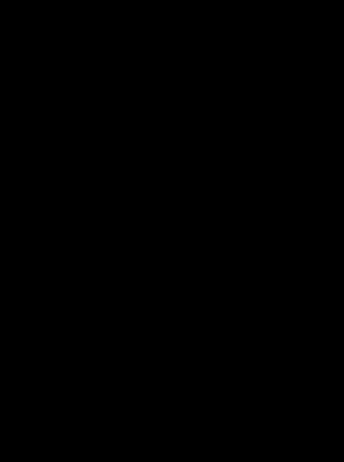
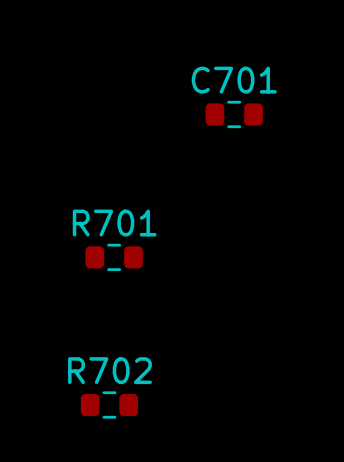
C701: none -> (234, 114)
R701: none -> (114, 257)
R702: none -> (109, 404)

